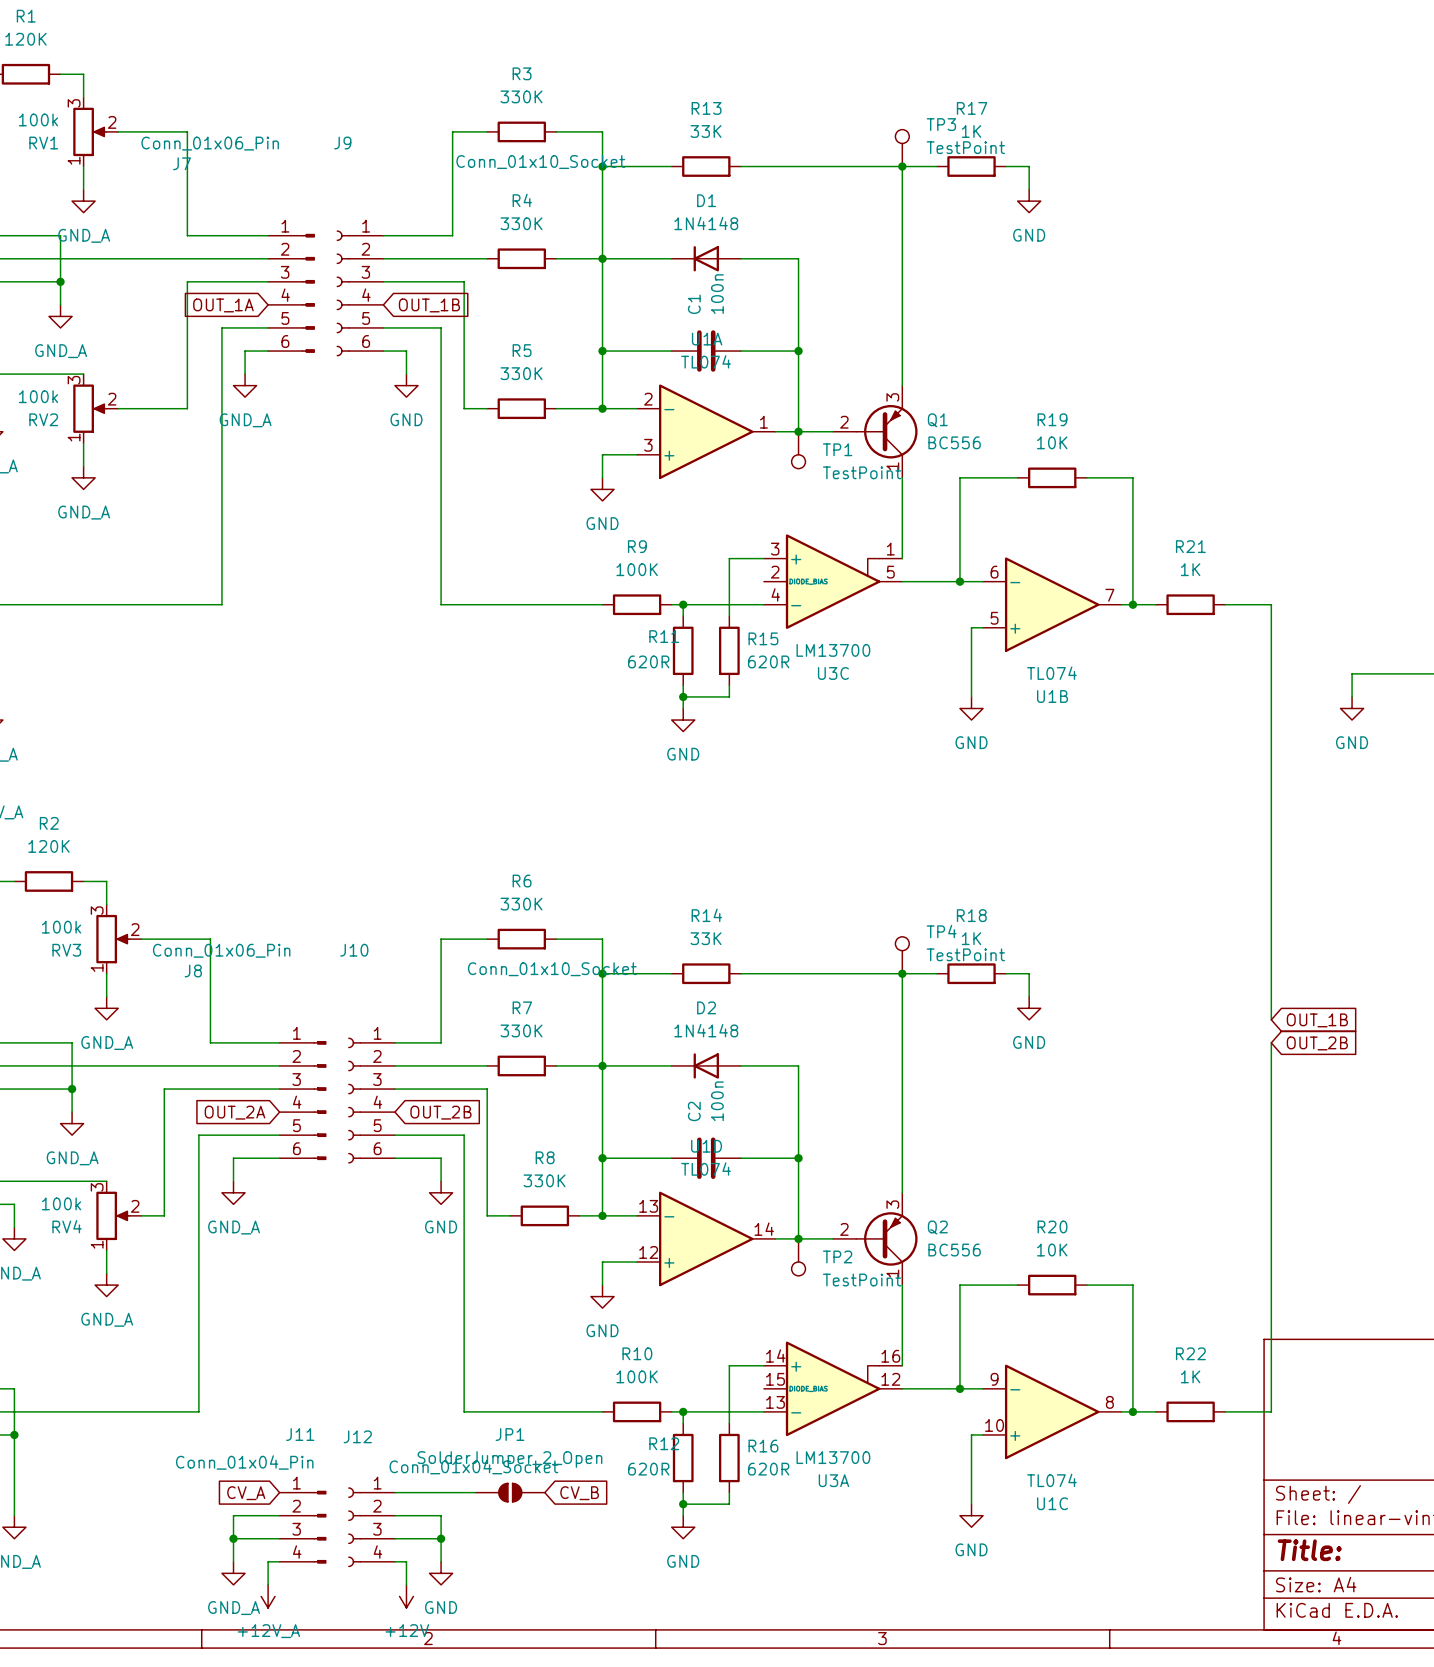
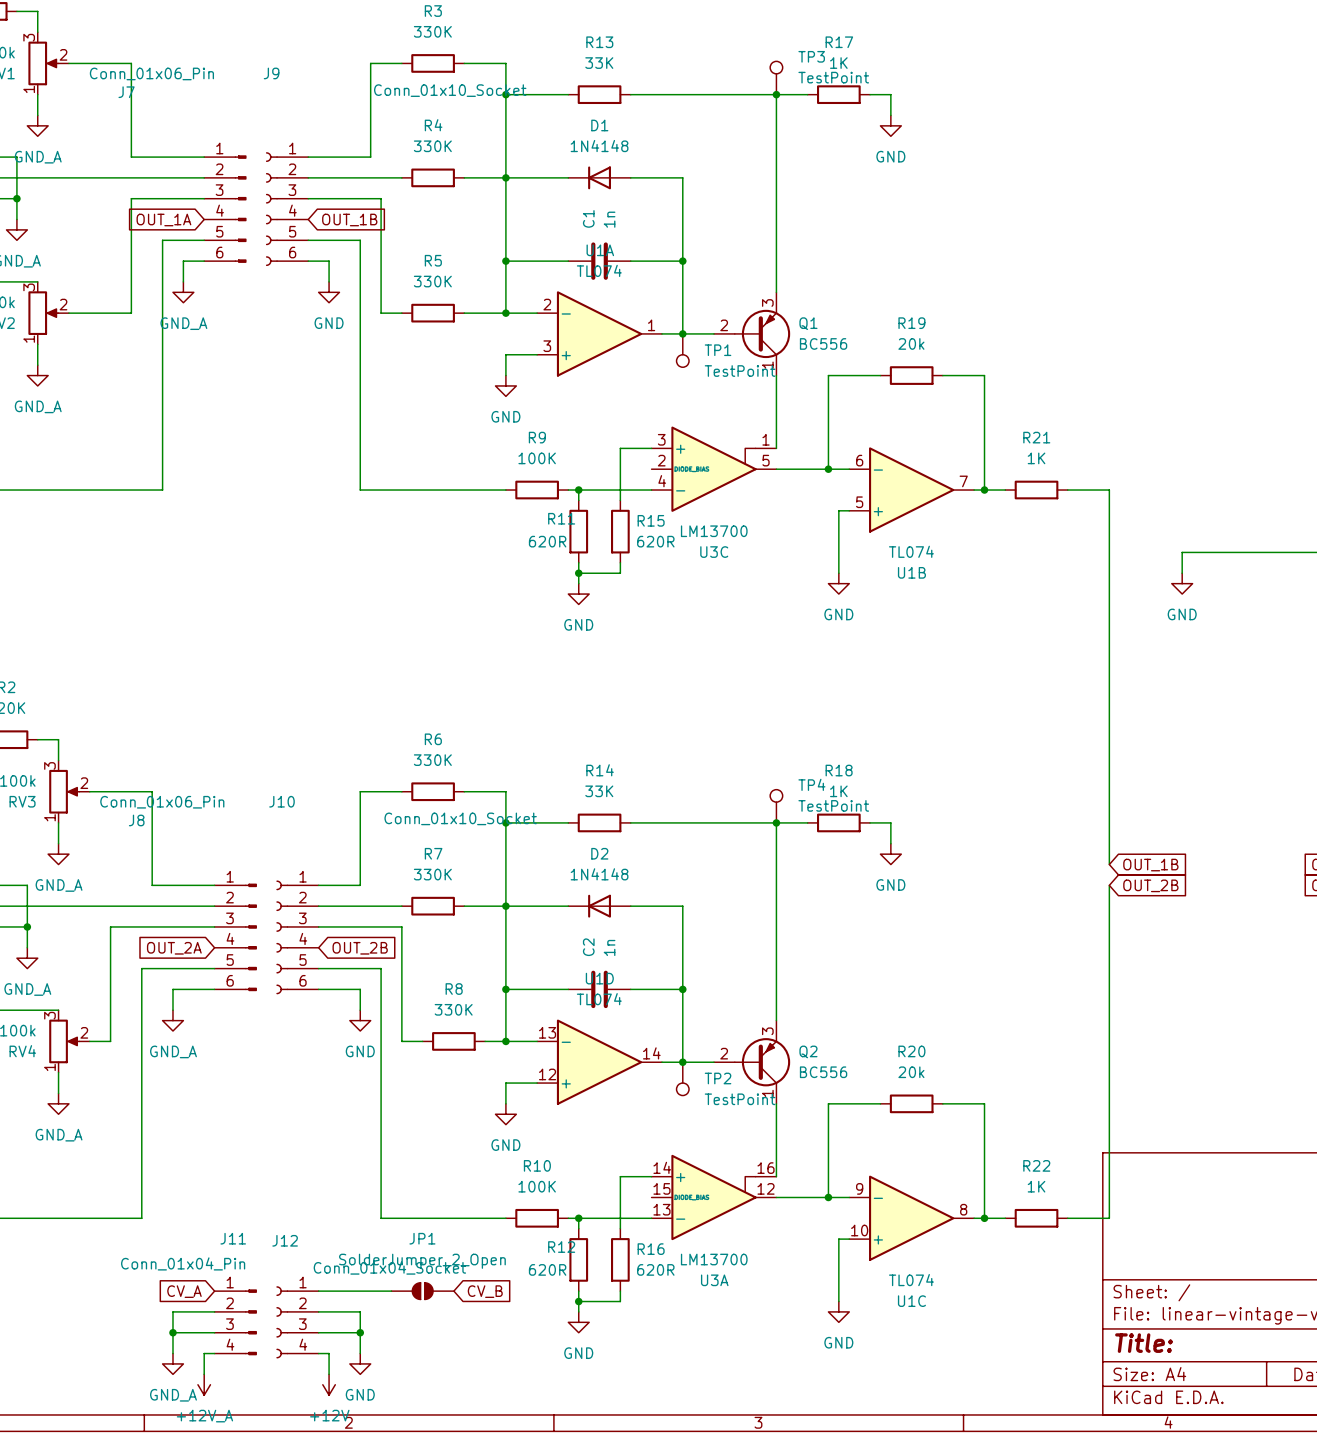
C1 value: 100n (717, 294) -> 1n (609, 219)
R19 value: 10K (1052, 442) -> 20k (911, 343)
C2 value: 100n (717, 1101) -> 1n (609, 947)
R20 value: 10K (1052, 1250) -> 20k (911, 1072)

